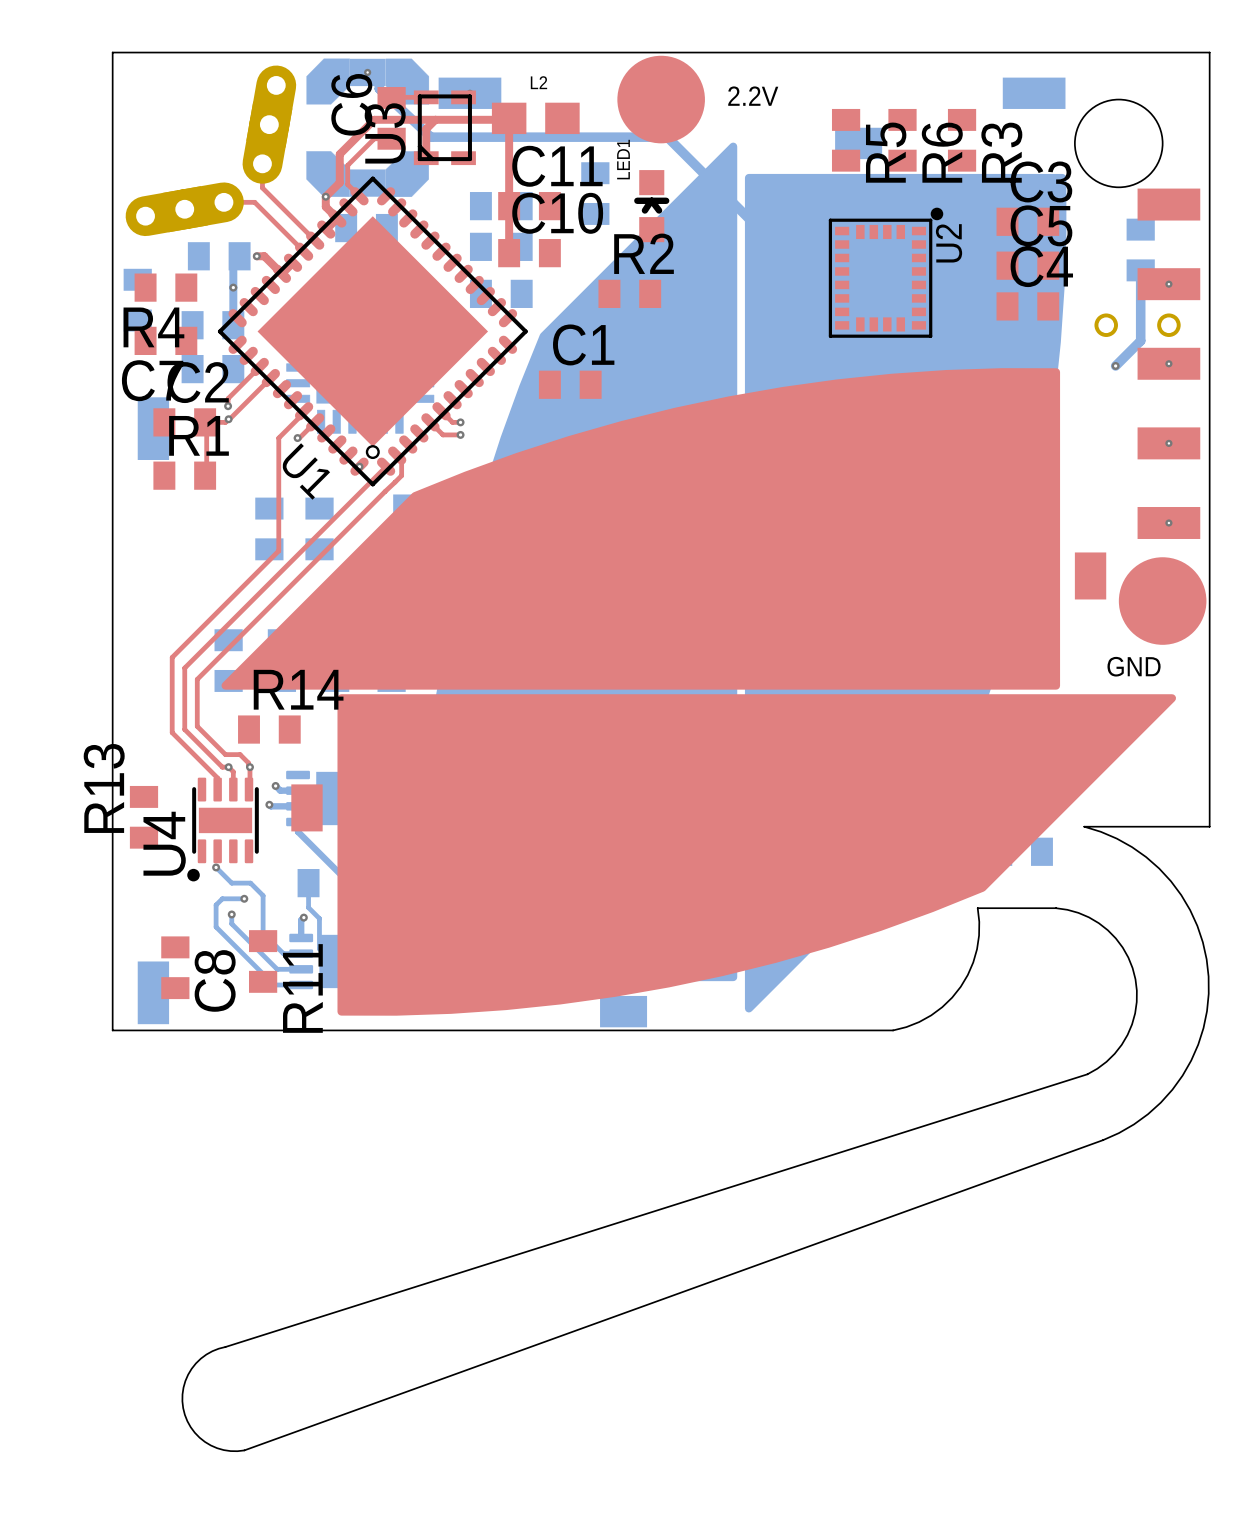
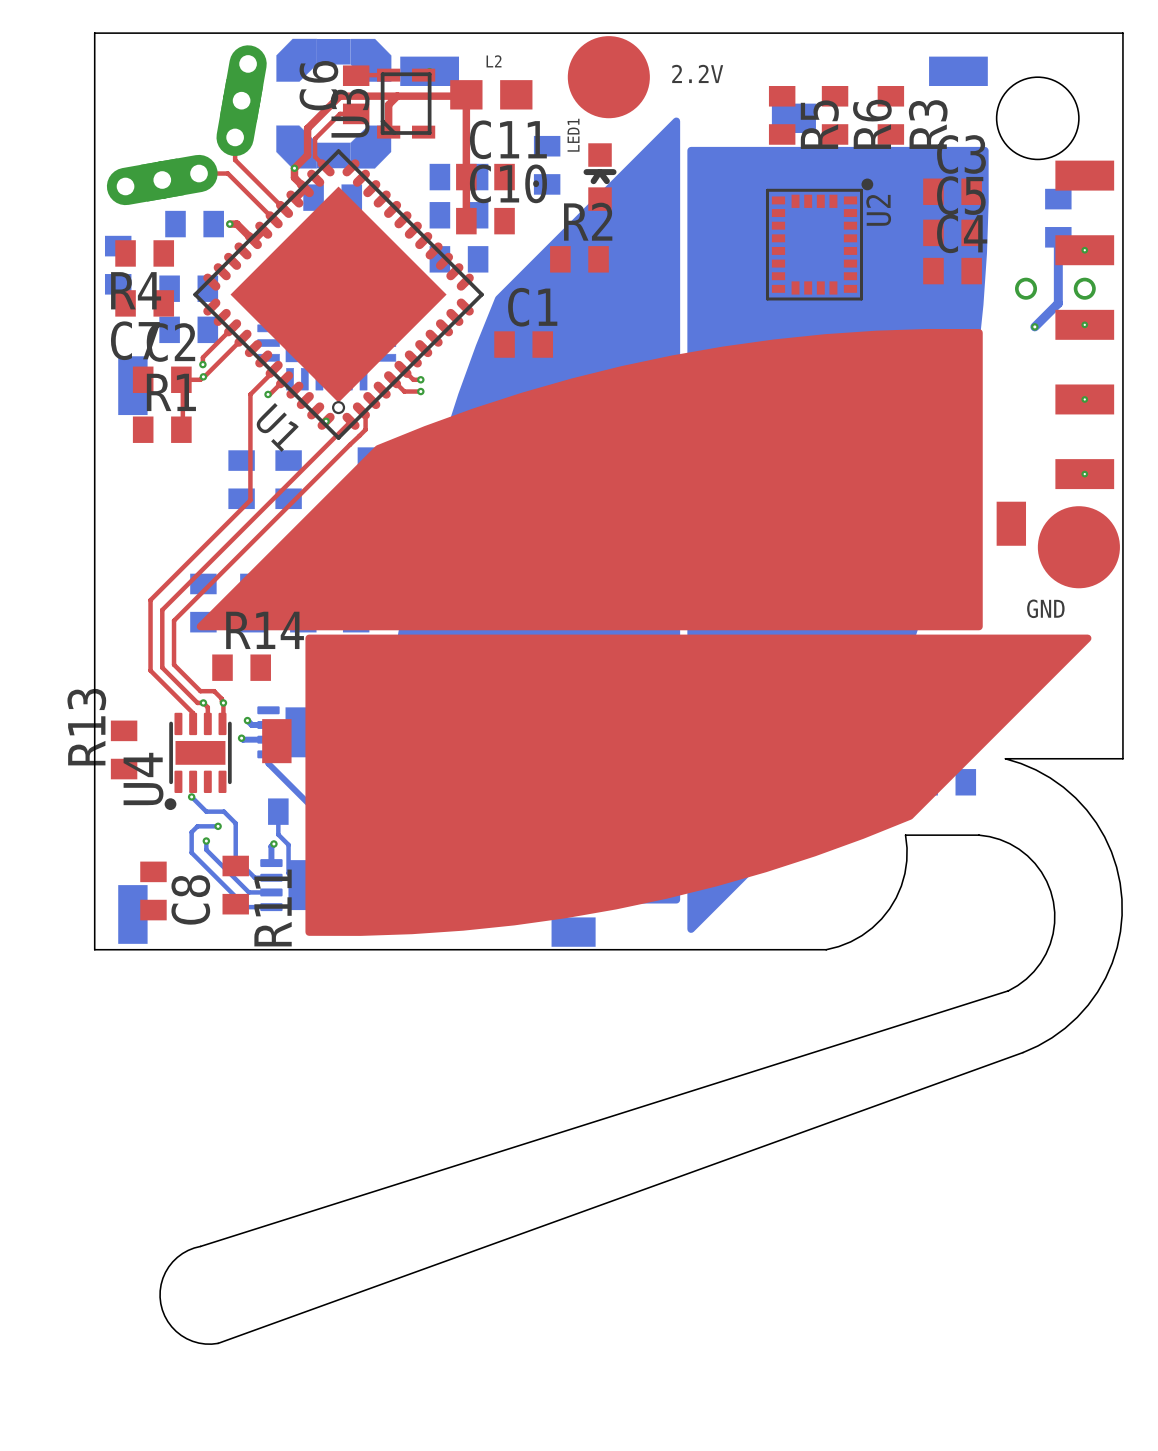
bottom track: (367, 72) (379, 84) (379, 88) (430, 137) (667, 137) (770, 240) (905, 240) -> none
via: (367, 72) -> none
bottom track: (239, 256) (233, 262) (233, 325) -> none
via: (233, 287) -> none

